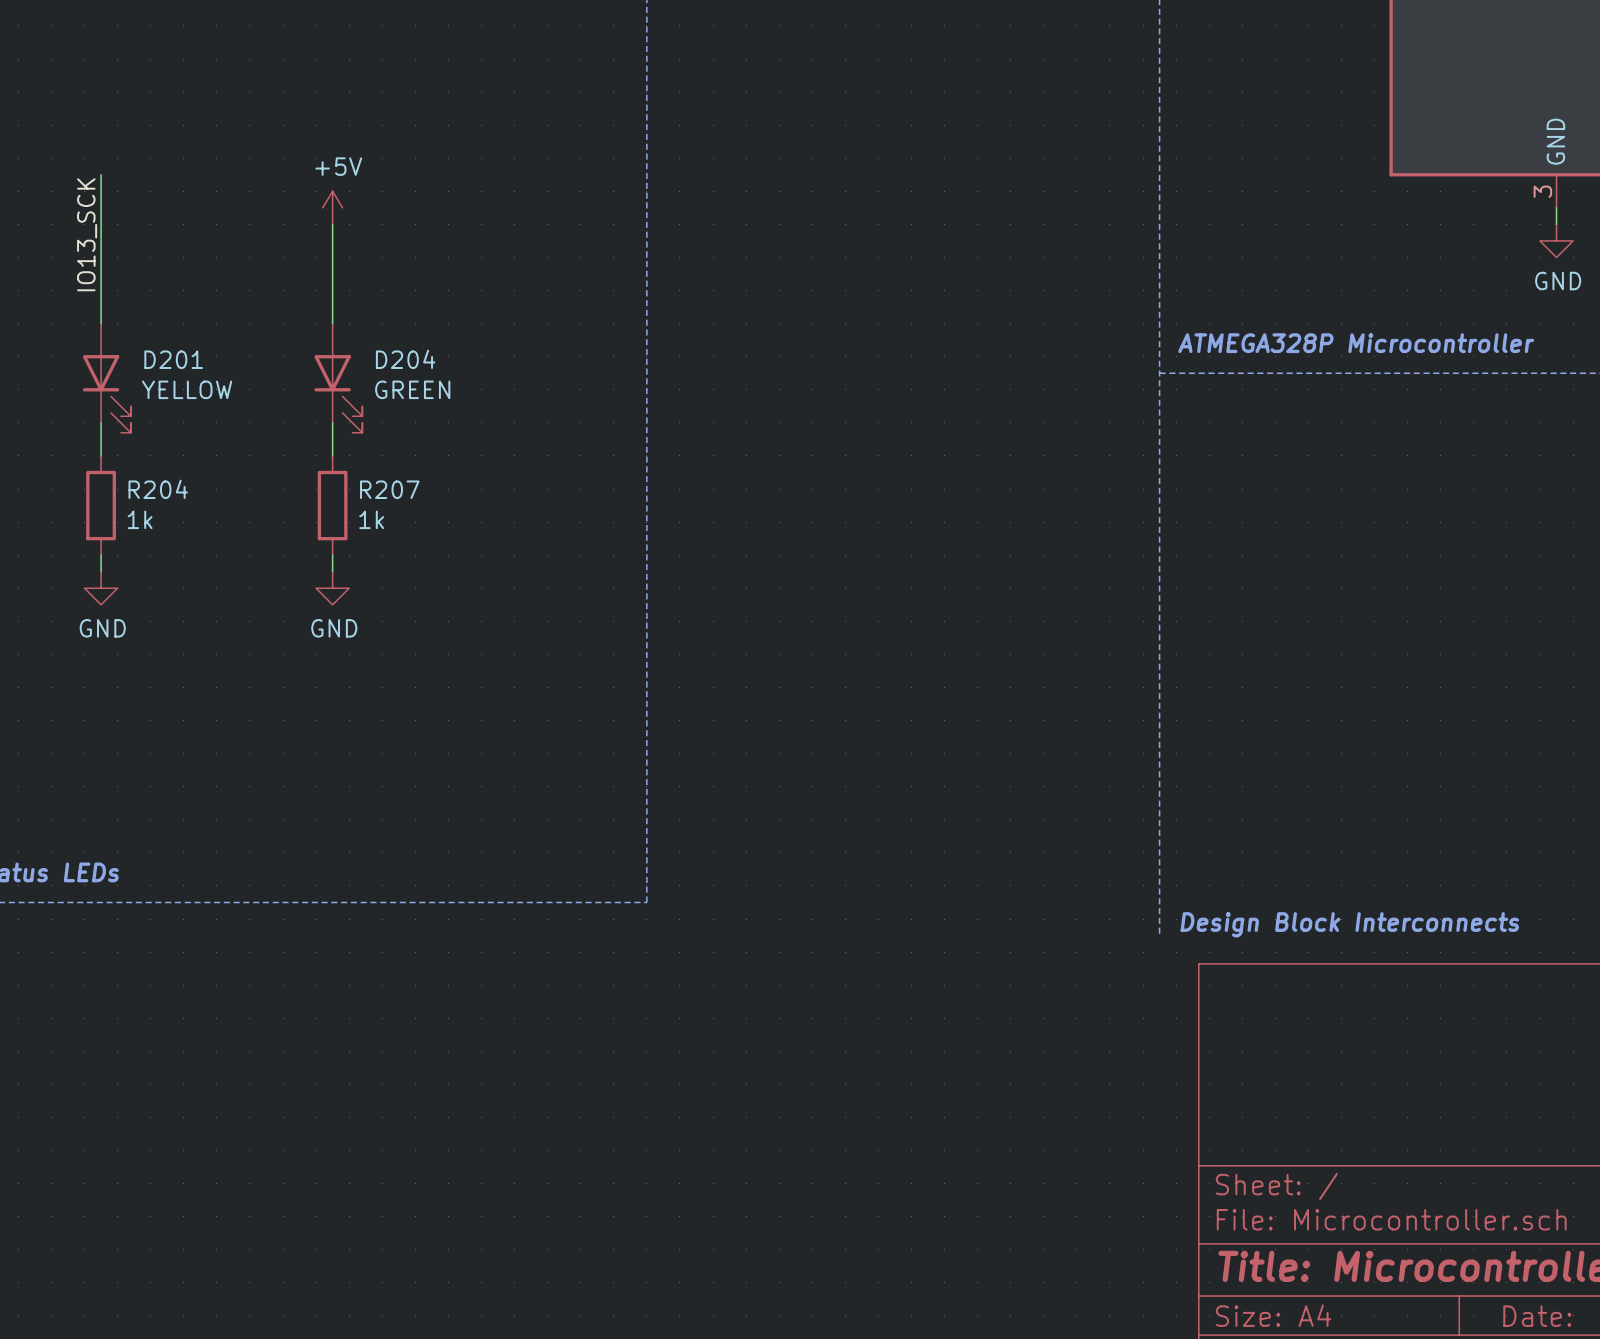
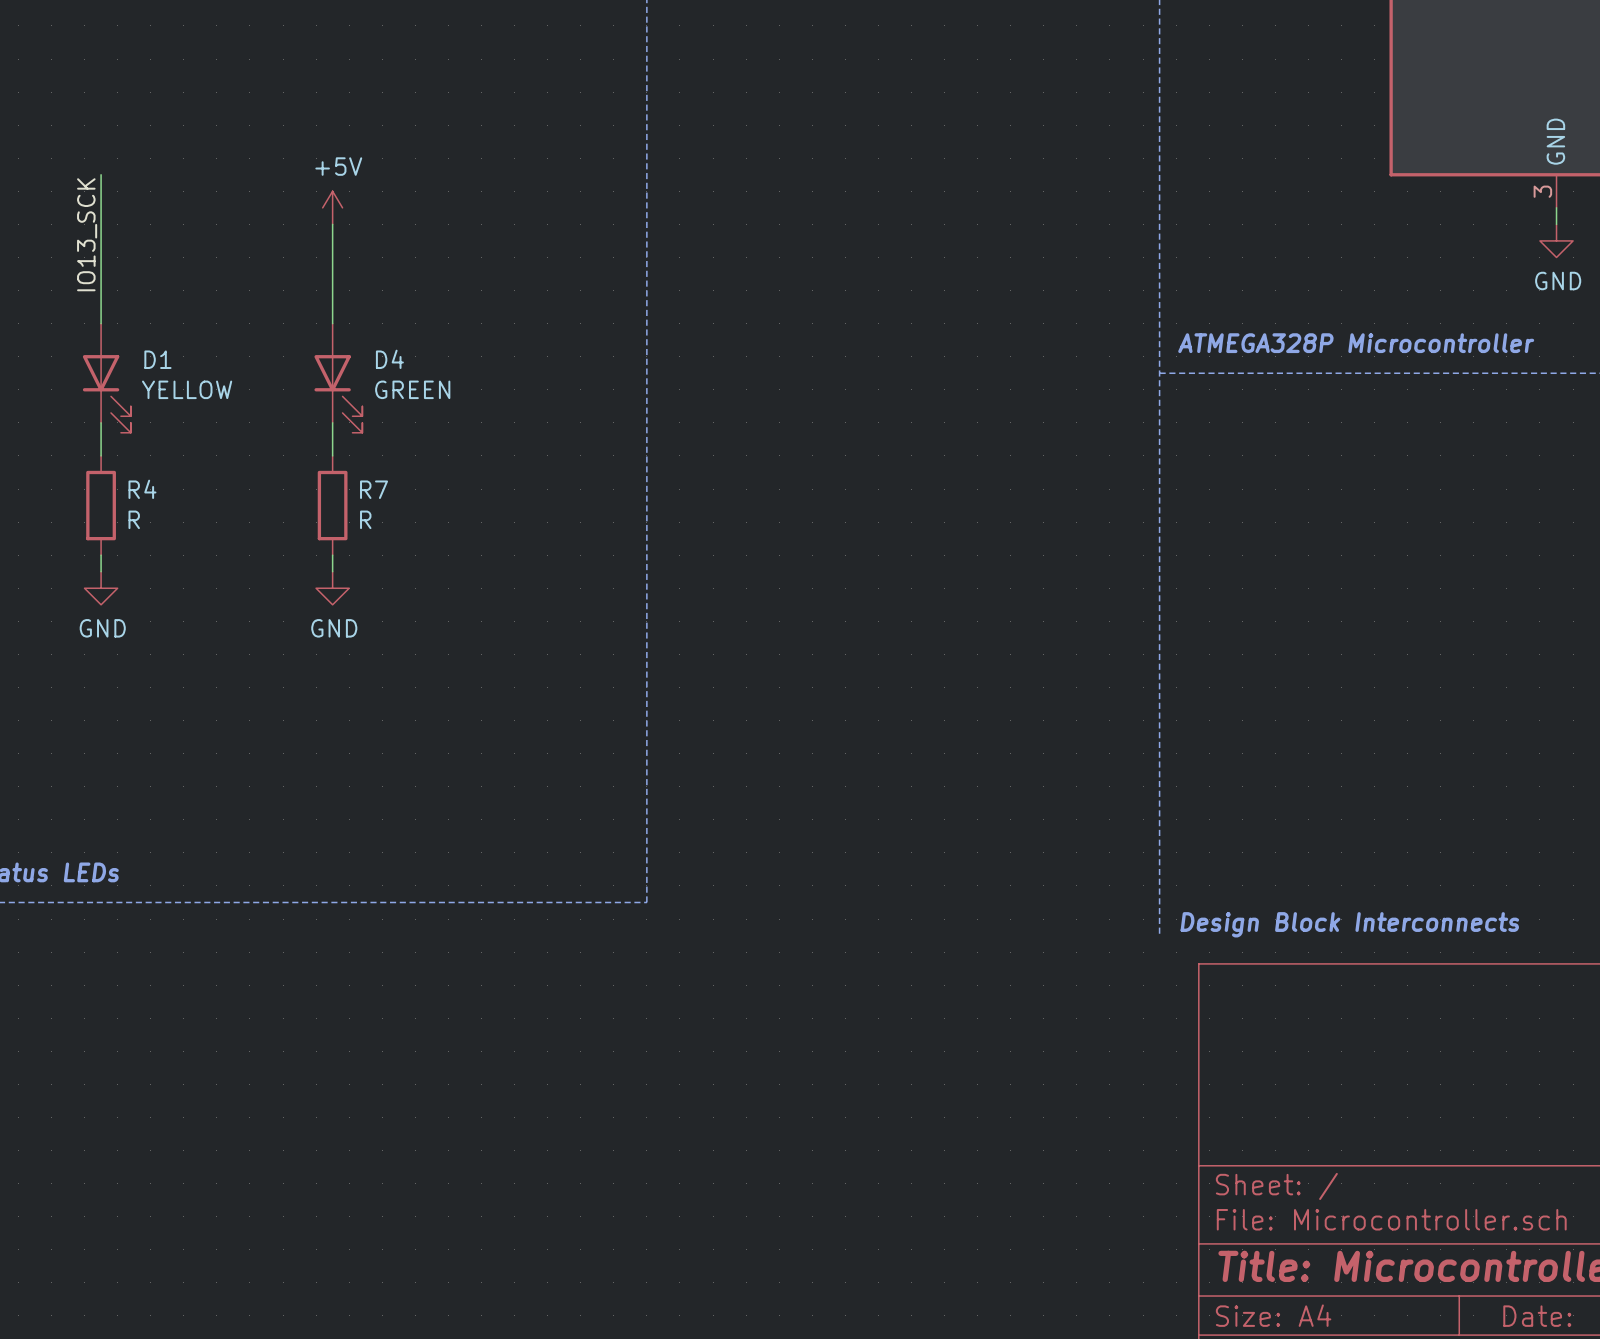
D201 name: D201 (173, 359) -> D1 (157, 359)
D204 name: D204 (405, 359) -> D4 (389, 359)
R204 name: R204 (158, 489) -> R4 (142, 489)
R207 name: R207 (389, 489) -> R7 (374, 489)
R204 value: 1k (140, 519) -> R (134, 519)
R207 value: 1k (371, 519) -> R (365, 519)

